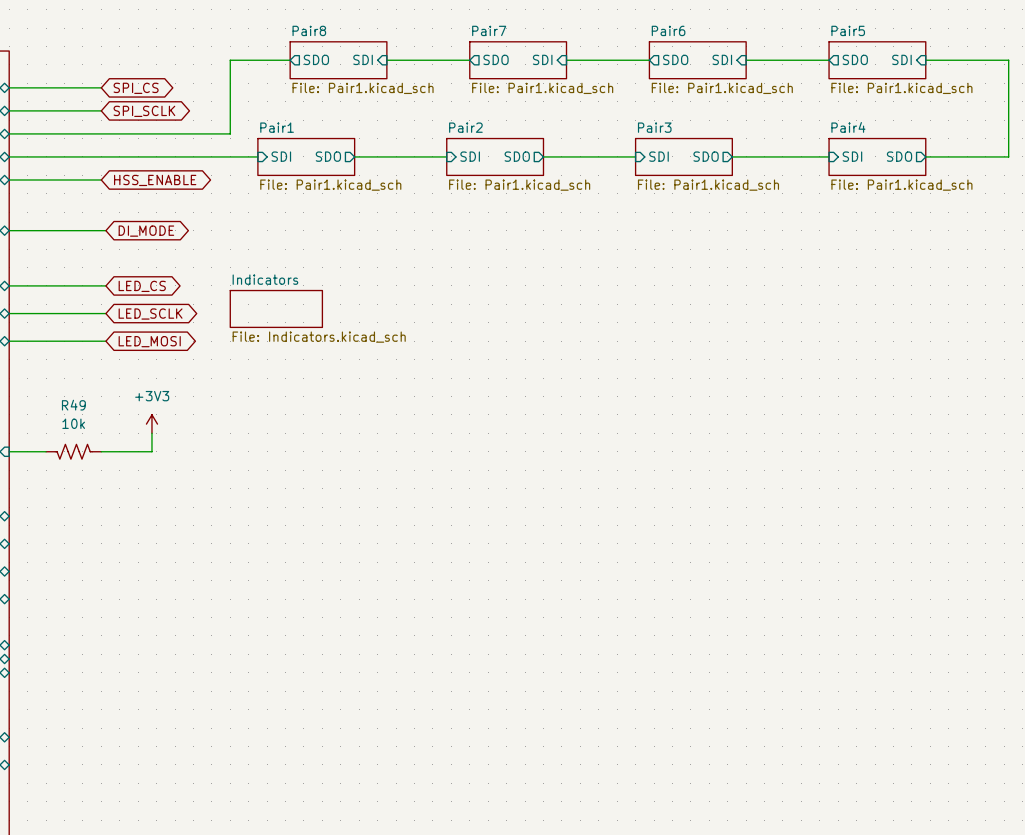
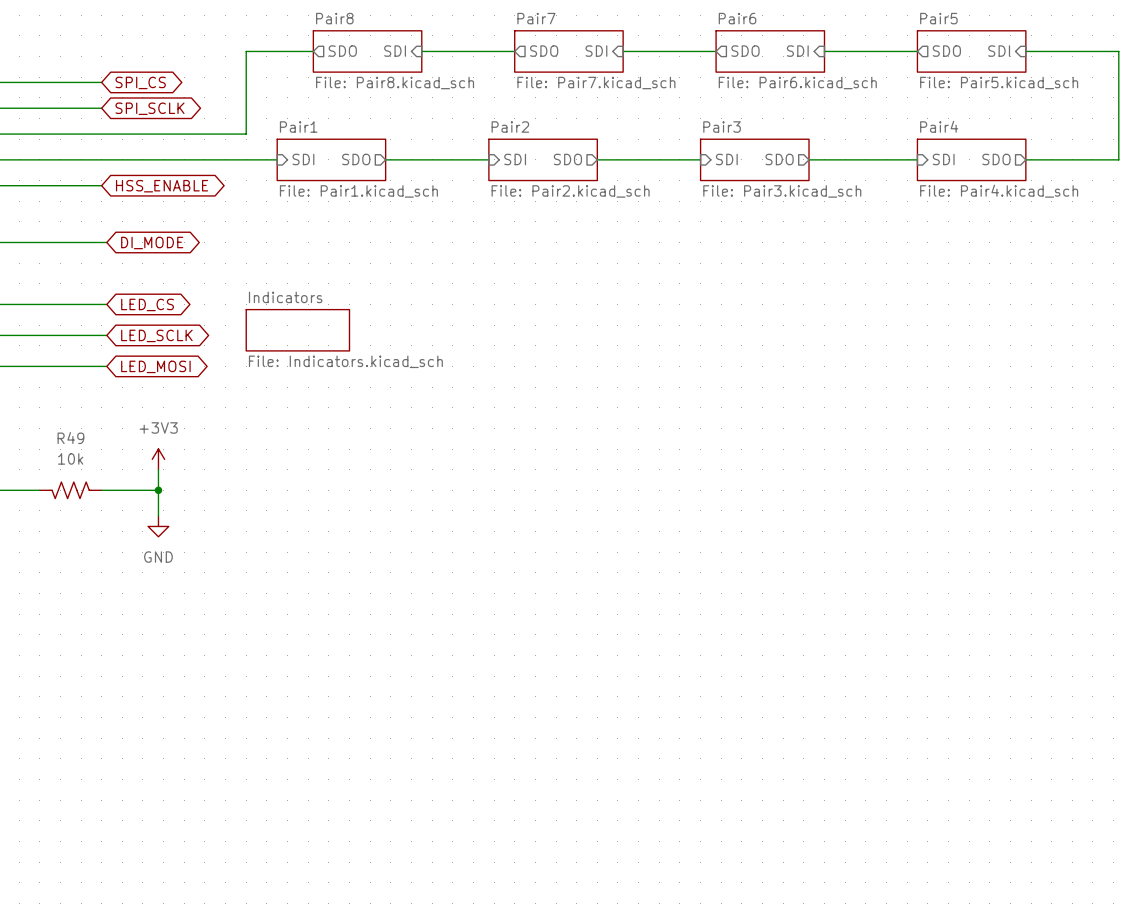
sheet Pair8 value: File: Pair1.kicad_sch (363, 88) -> File: Pair8.kicad_sch (395, 83)
sheet Pair7 value: File: Pair1.kicad_sch (542, 88) -> File: Pair7.kicad_sch (596, 83)
sheet Pair6 value: File: Pair1.kicad_sch (722, 88) -> File: Pair6.kicad_sch (797, 83)
sheet Pair5 value: File: Pair1.kicad_sch (901, 88) -> File: Pair5.kicad_sch (999, 83)
sheet Pair2 value: File: Pair1.kicad_sch (519, 185) -> File: Pair2.kicad_sch (570, 191)
sheet Pair3 value: File: Pair1.kicad_sch (708, 185) -> File: Pair3.kicad_sch (782, 191)
sheet Pair4 value: File: Pair1.kicad_sch (901, 185) -> File: Pair4.kicad_sch (999, 191)
wire: none -> (158, 490) (158, 516)
junction: none -> (158, 490)
power symbol: none -> GND (158, 526)

